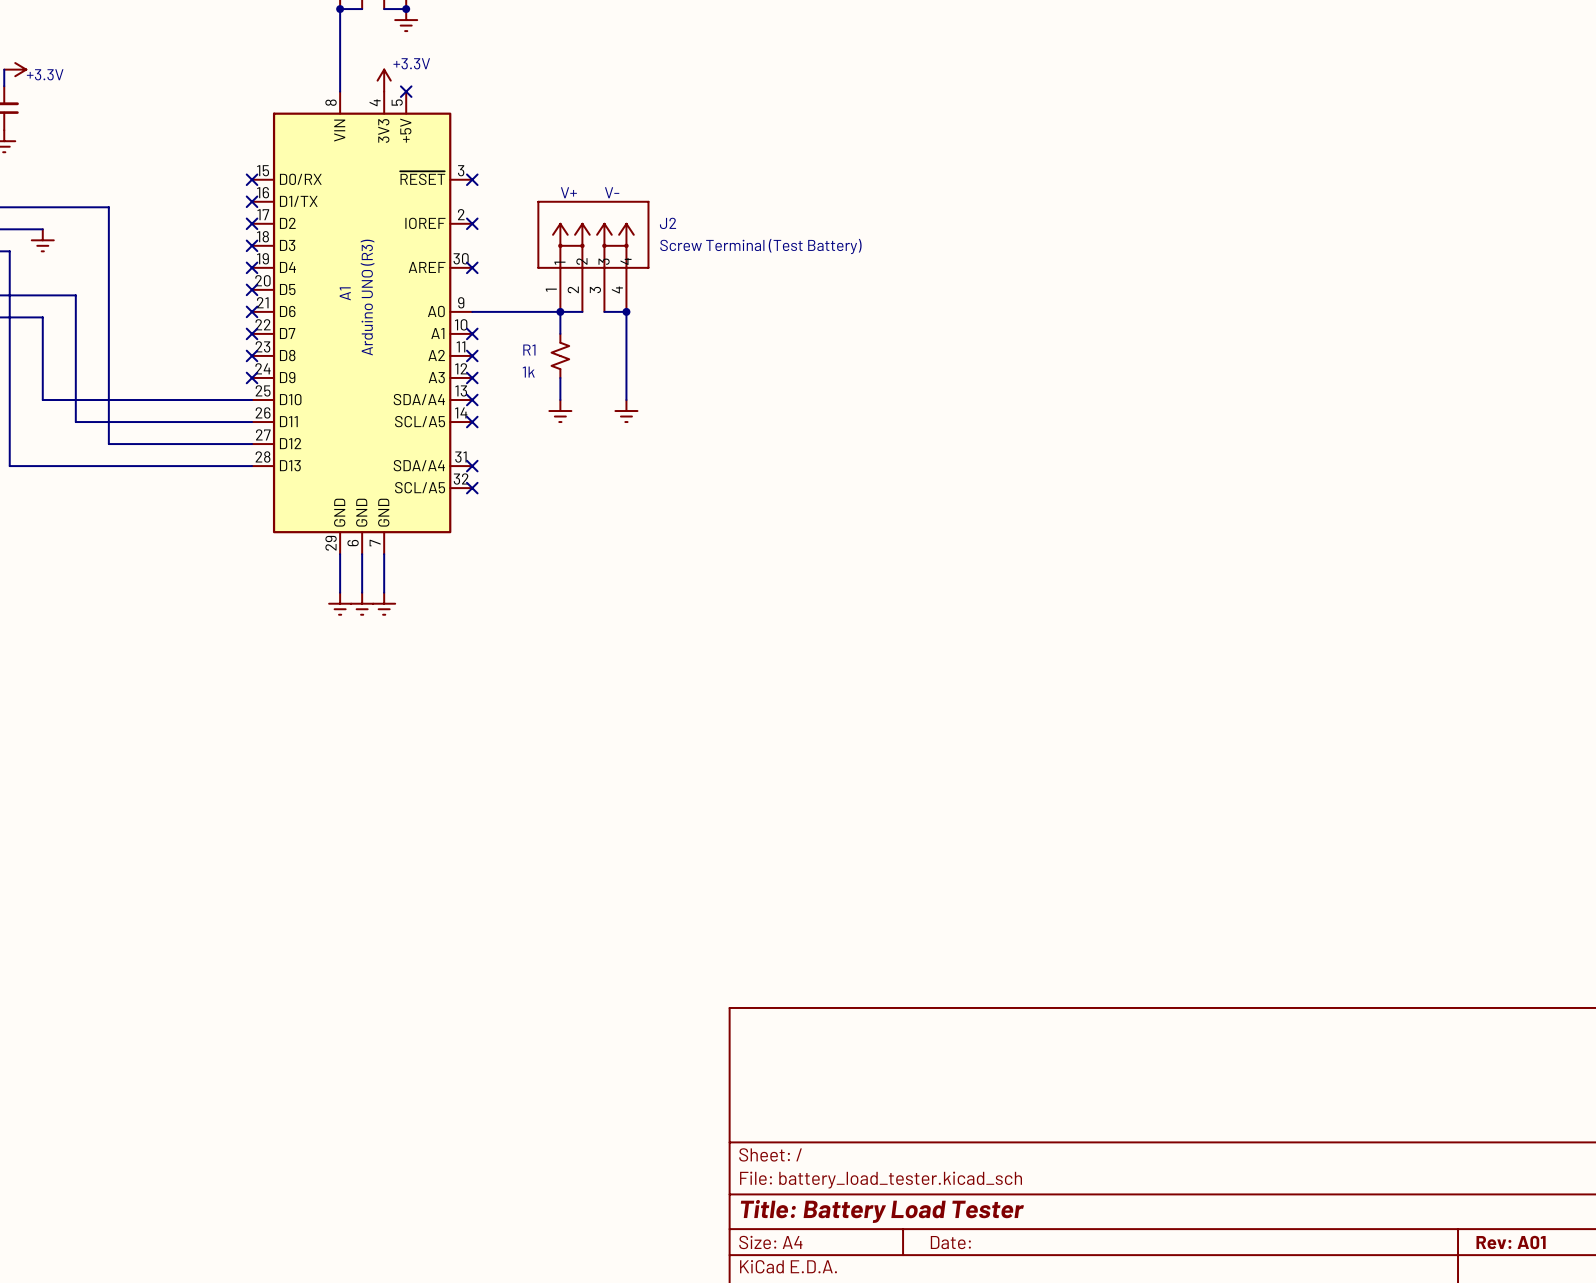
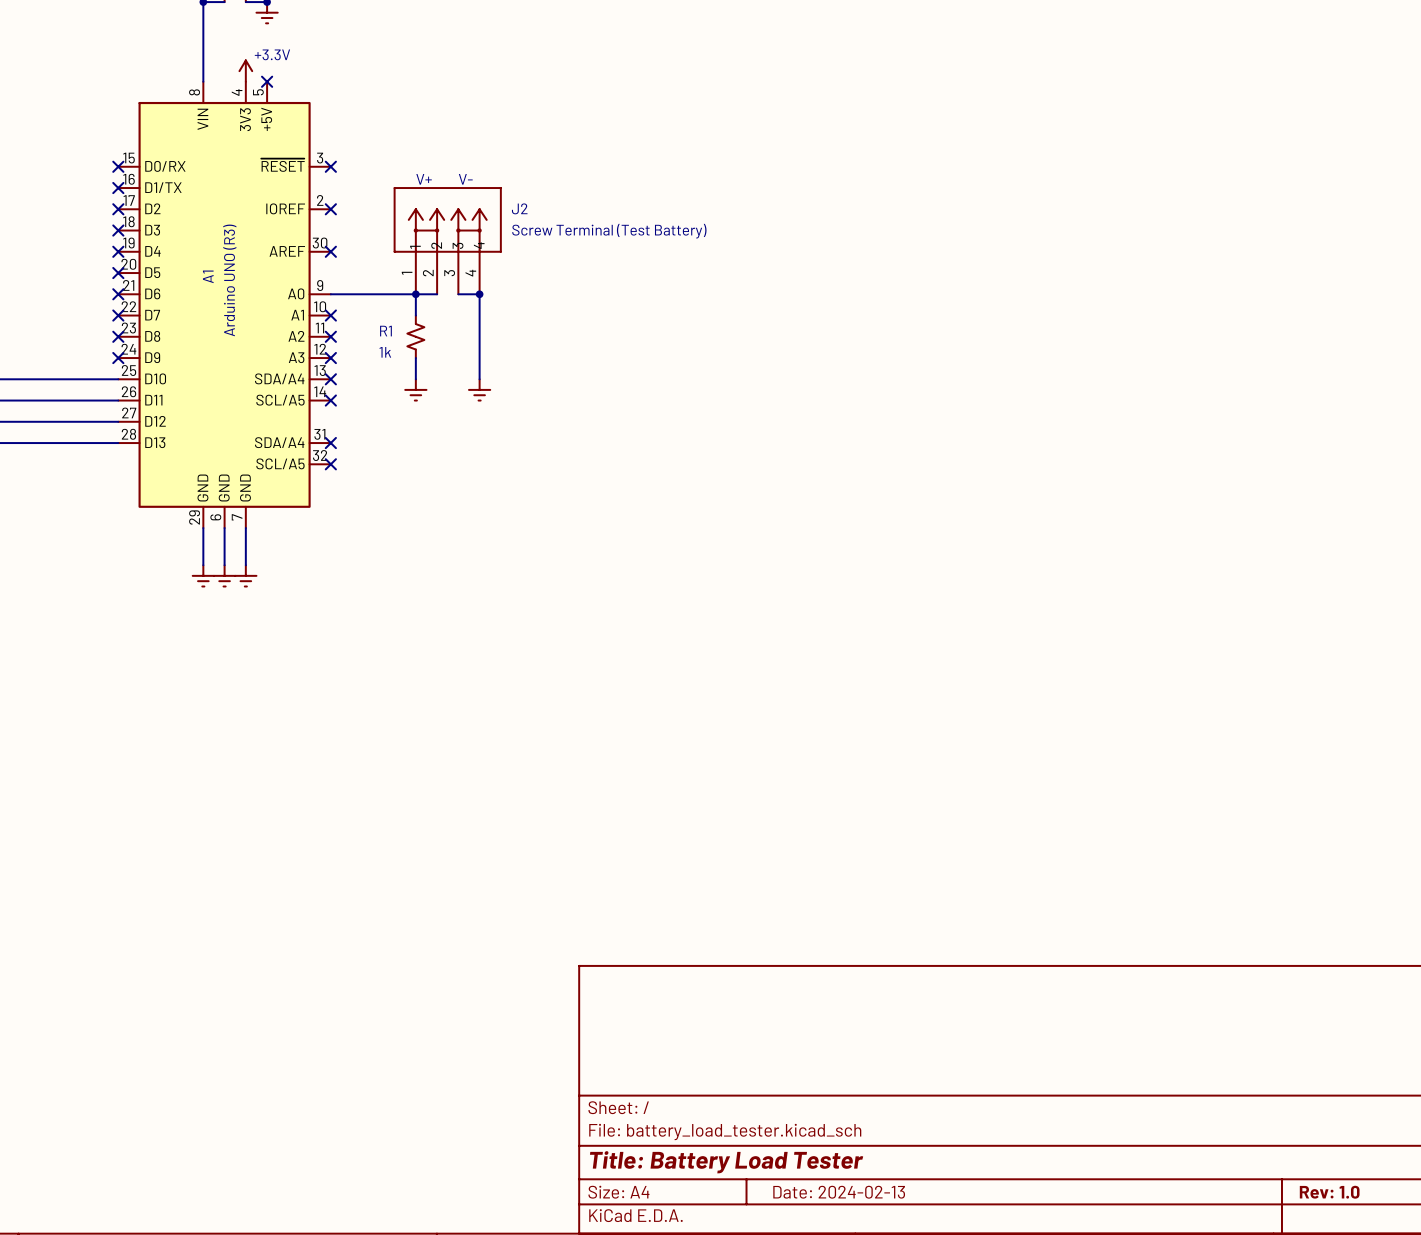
title block: Date: (950, 1242) -> Date: 2024-02-13 (839, 1192)
title block: Rev: A01 (1511, 1242) -> Rev: 1.0 (1329, 1192)

